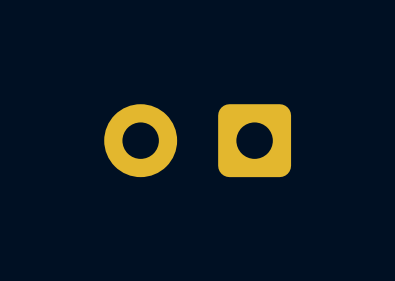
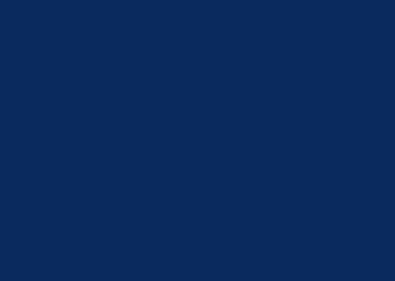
part: (197, 140) -> none

